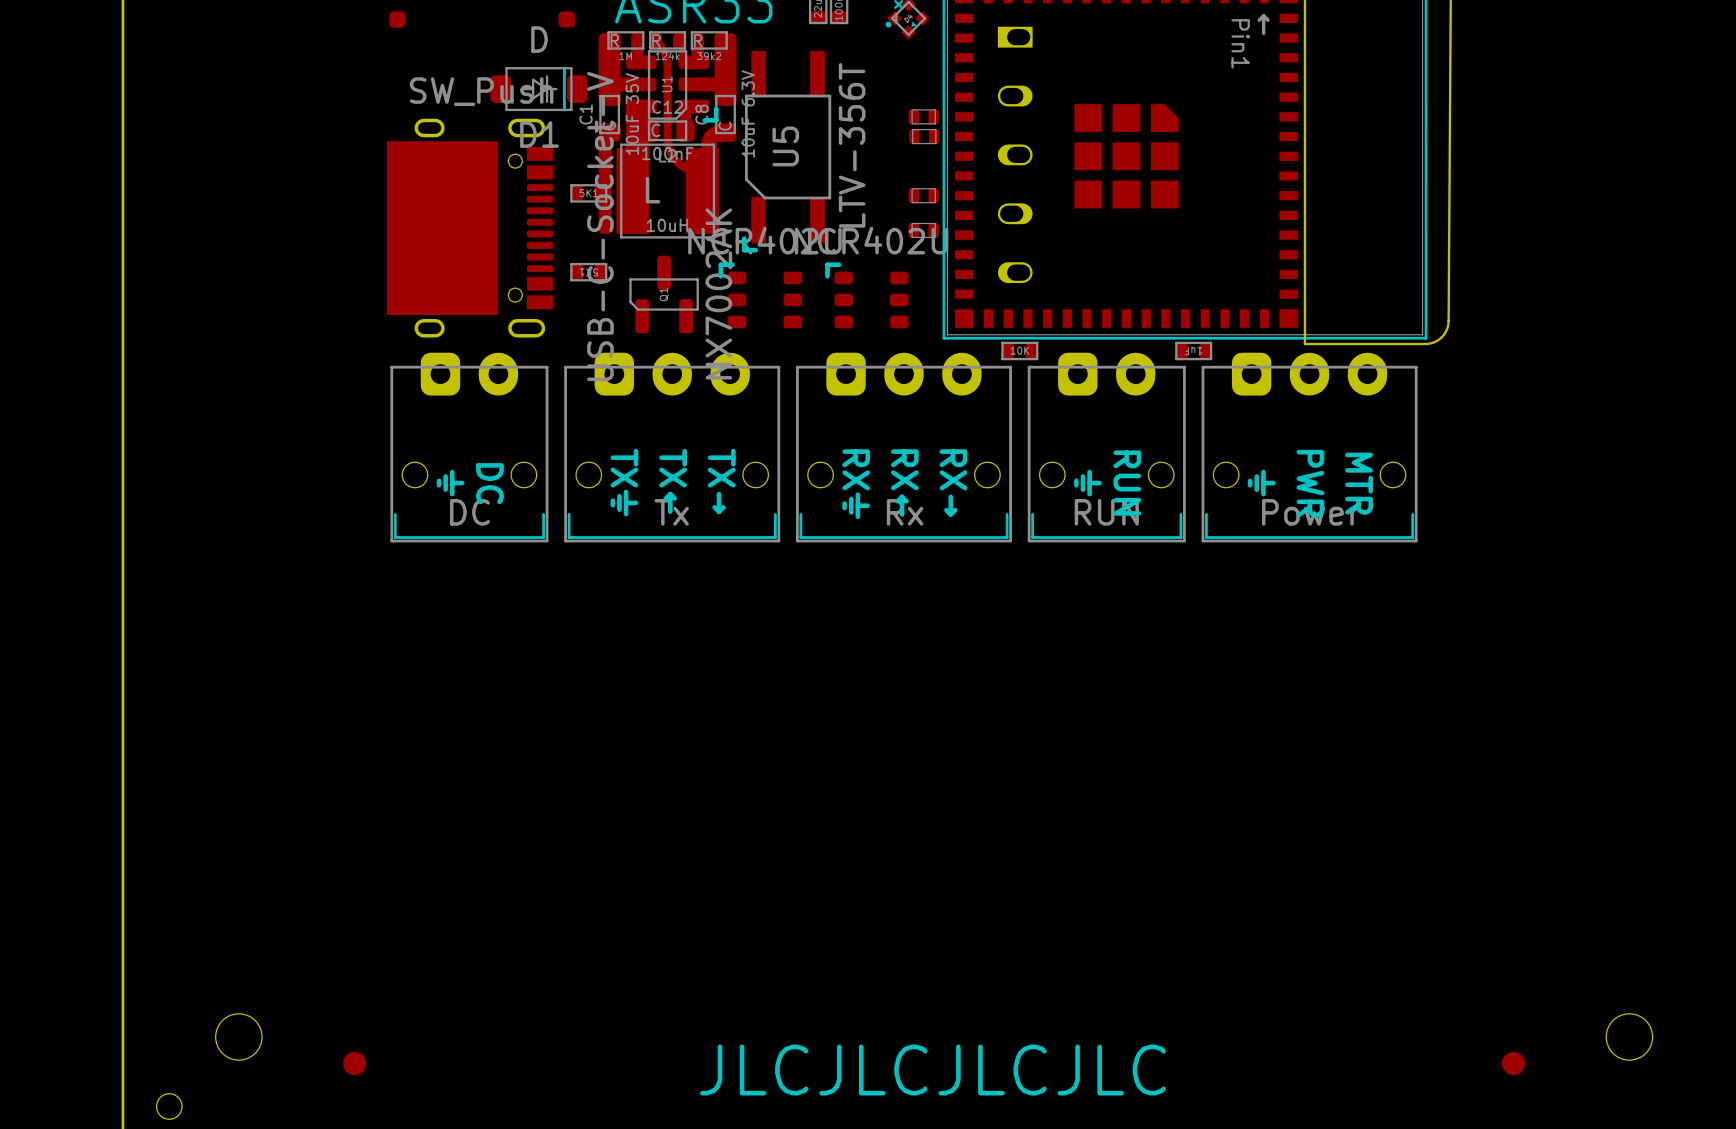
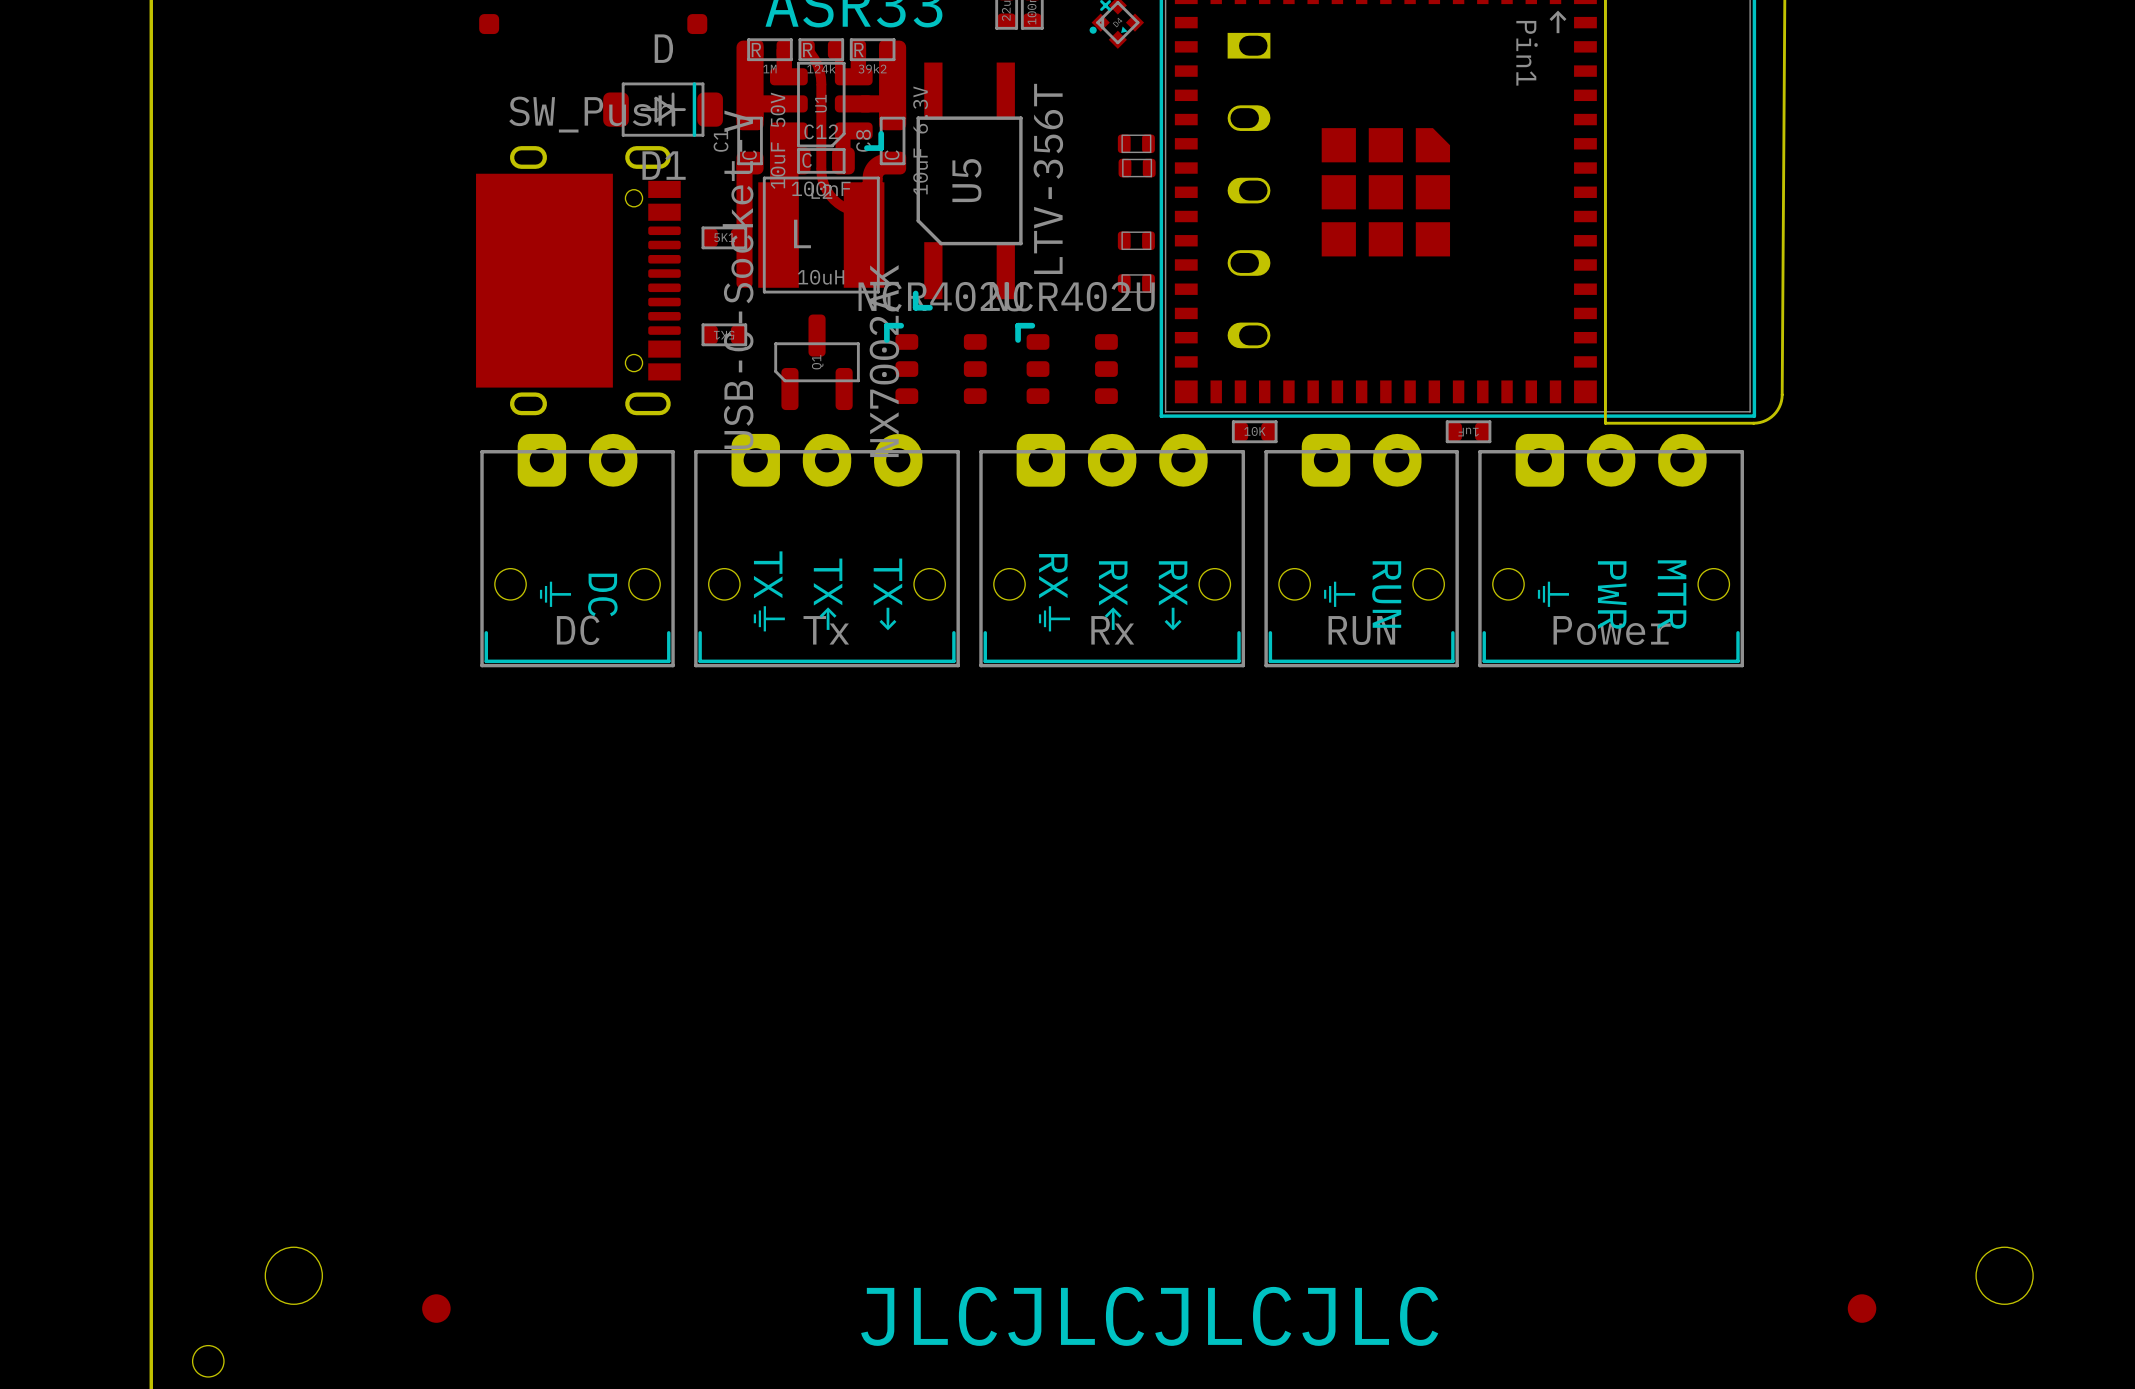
C1 value: 10uF 35V (632, 114) -> 10uF 50V (778, 140)

